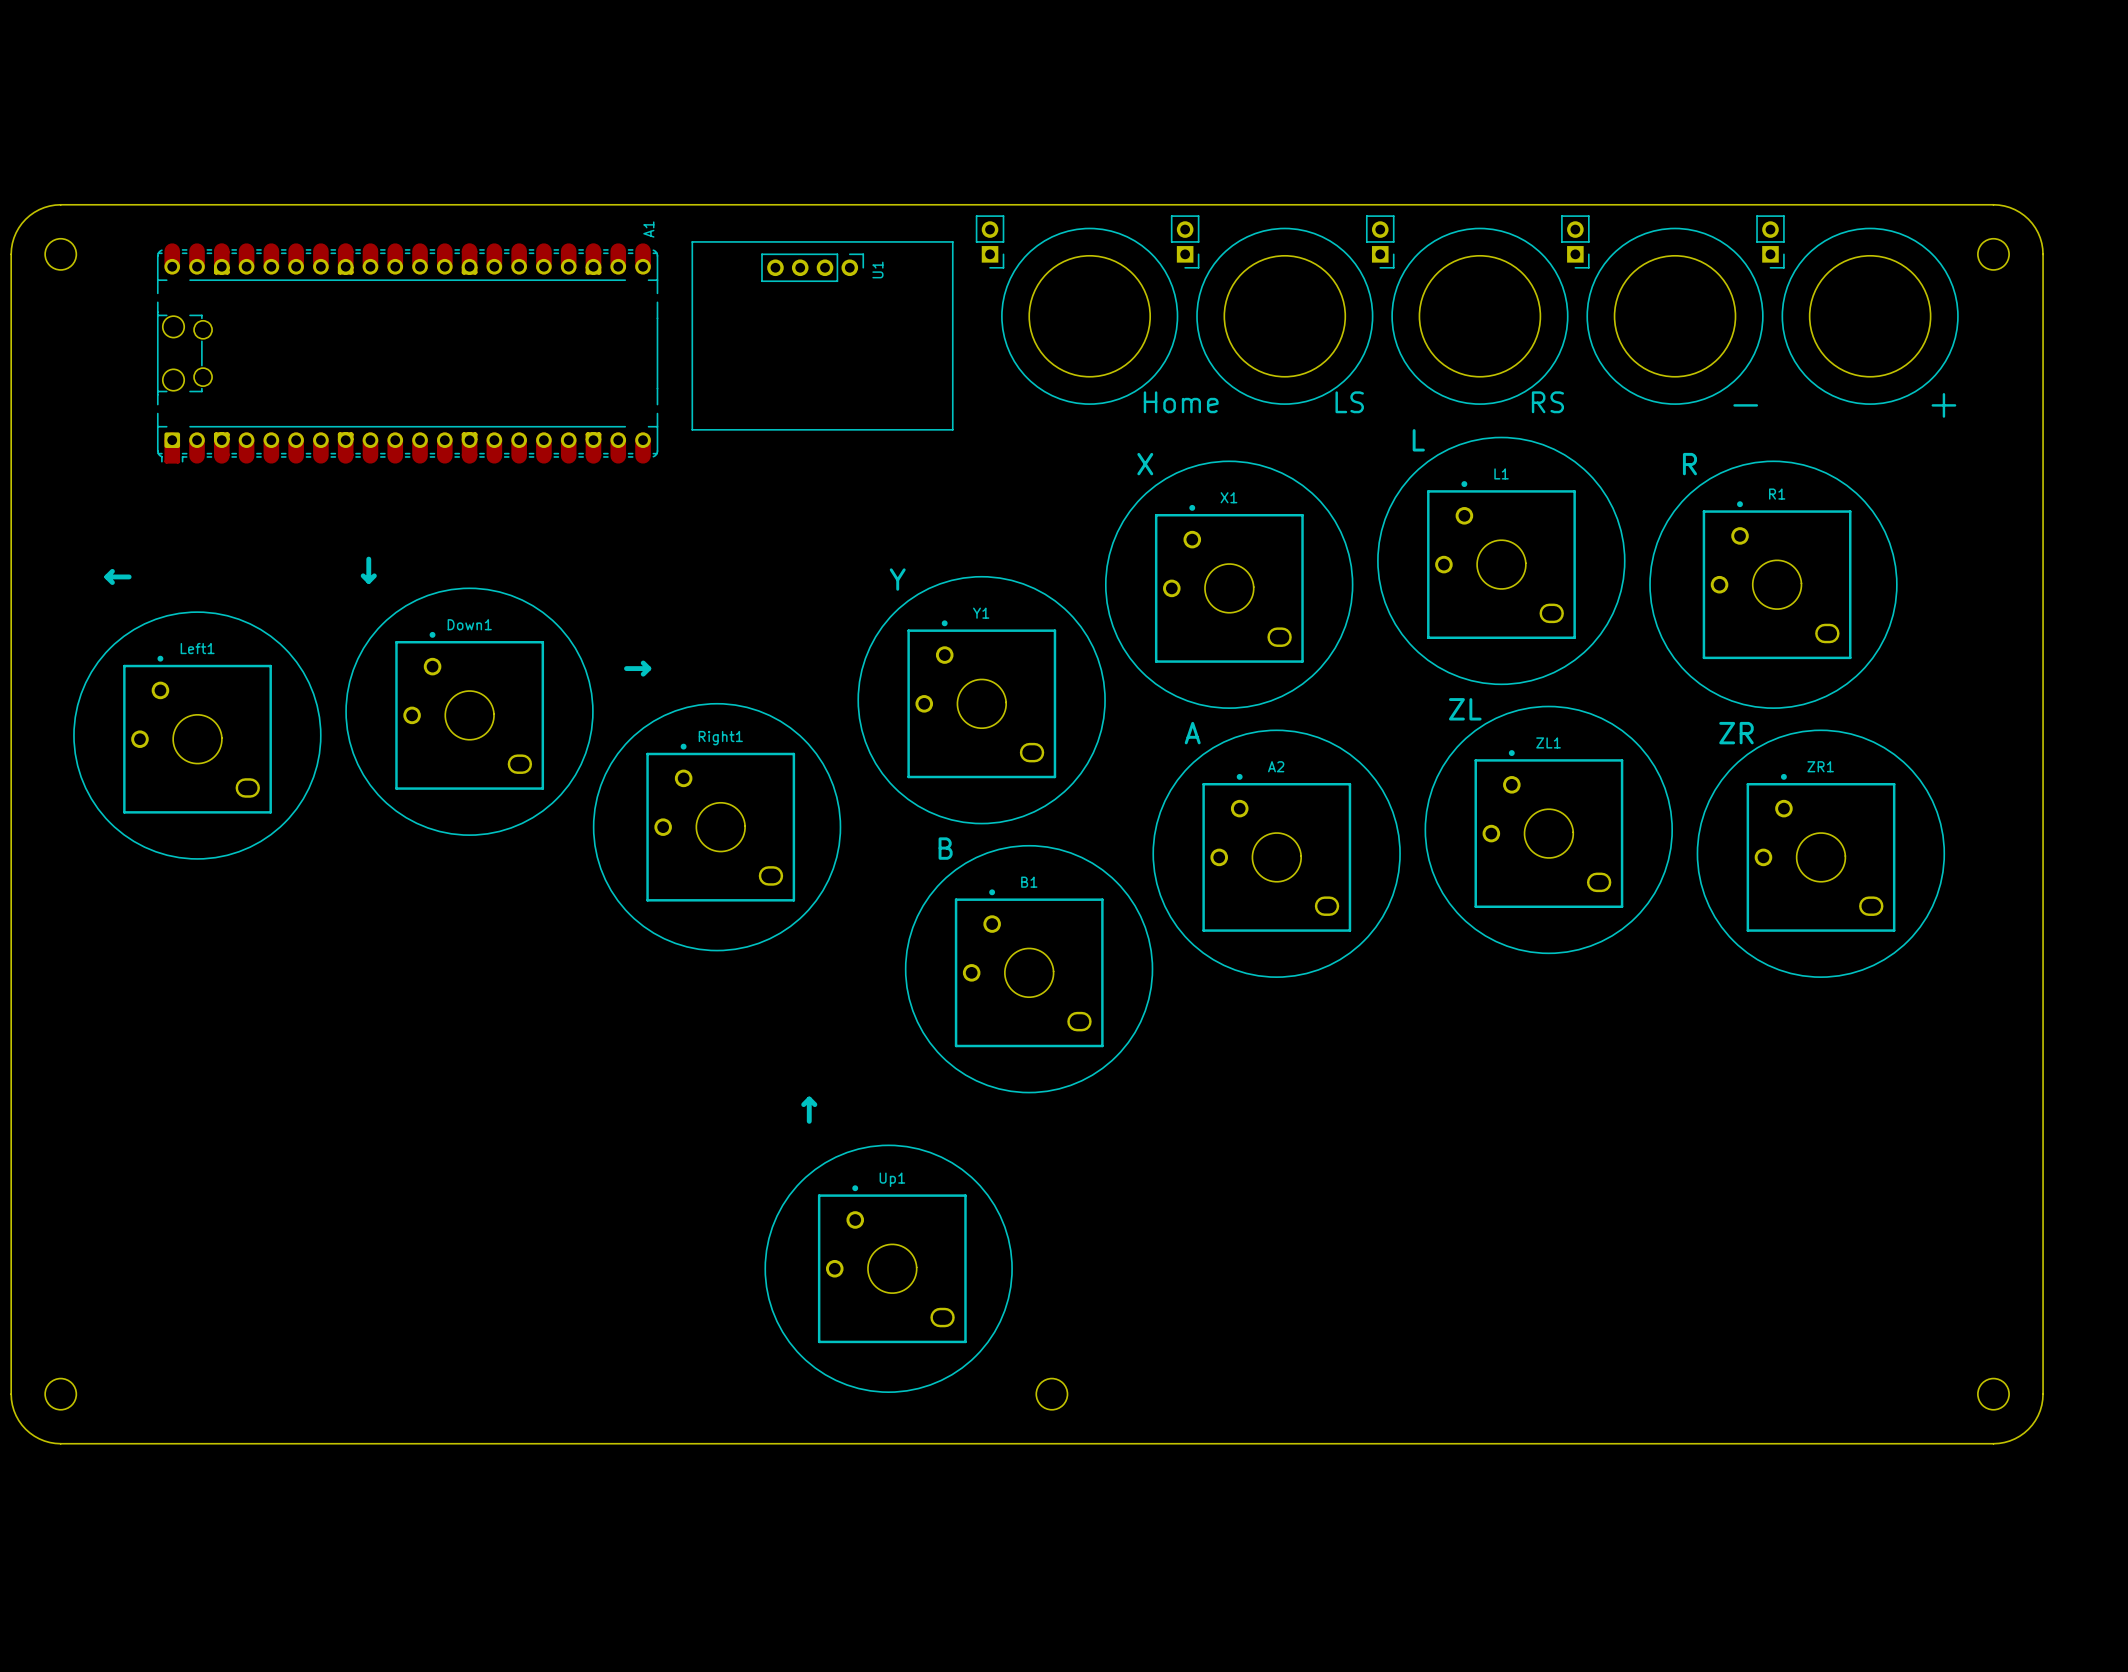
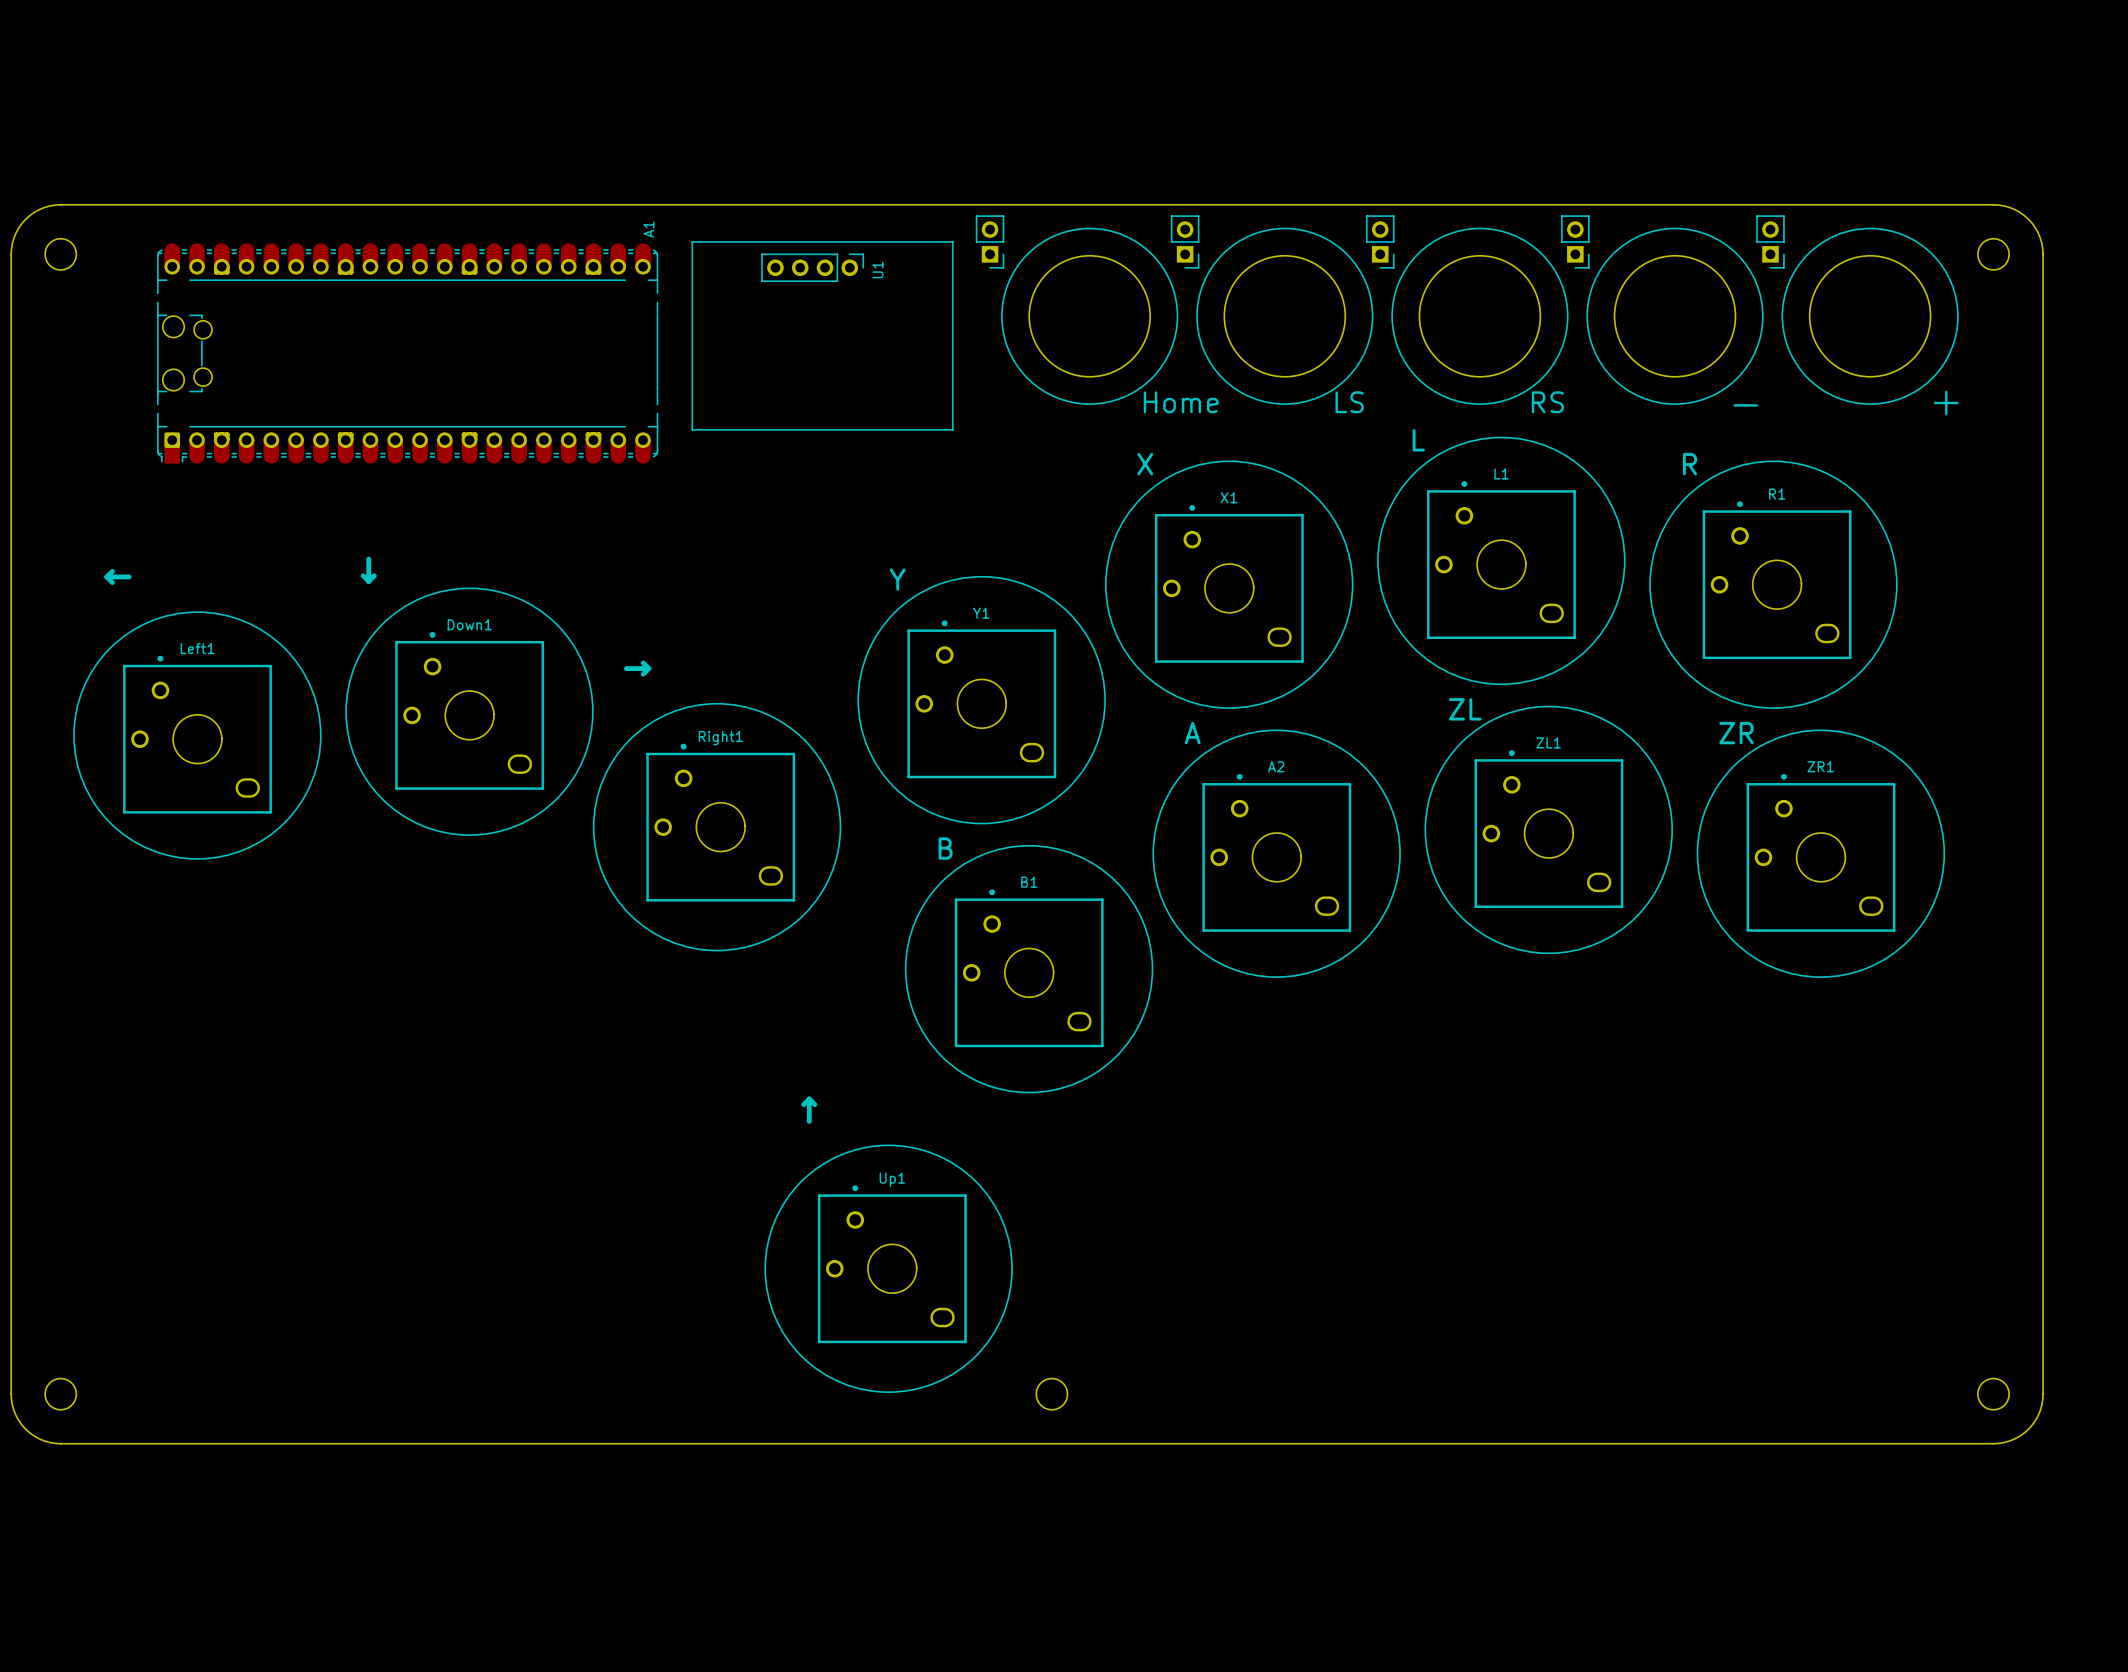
part name rotation: 0° (1943, 405) -> 90° counterclockwise (1946, 403)

